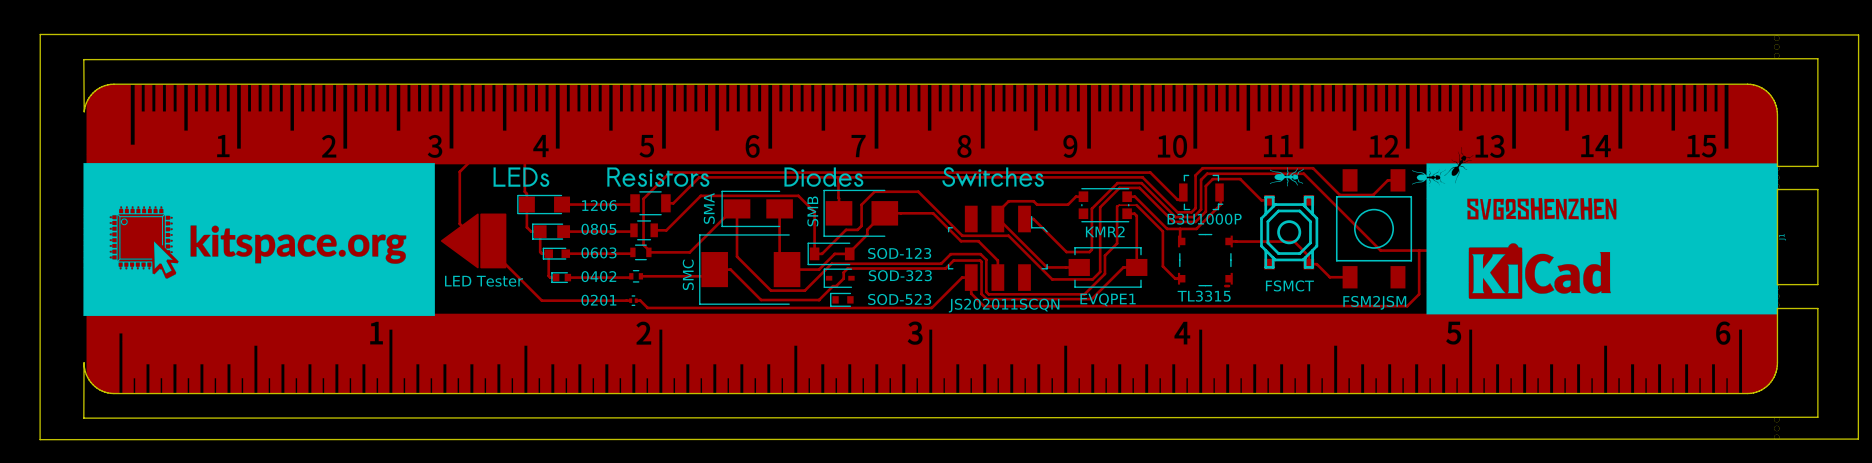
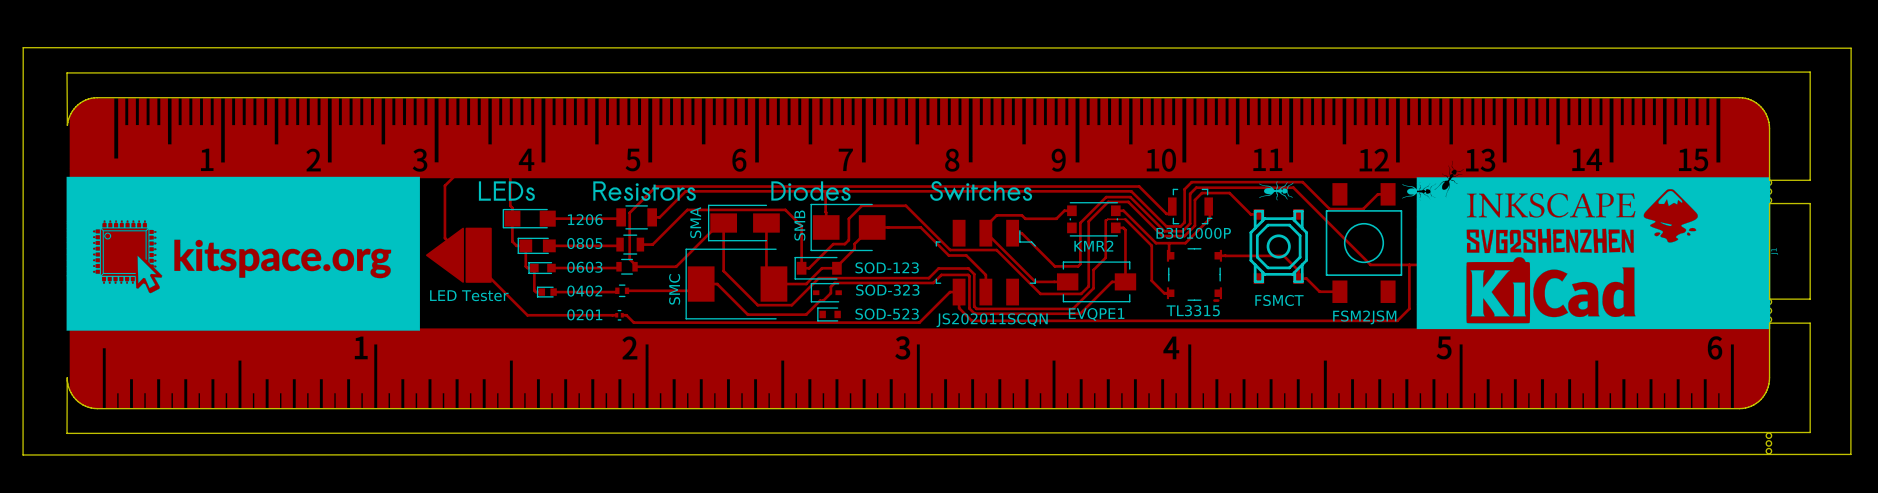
part footprint: [39, 33, 1860, 441] -> [22, 47, 1852, 456]

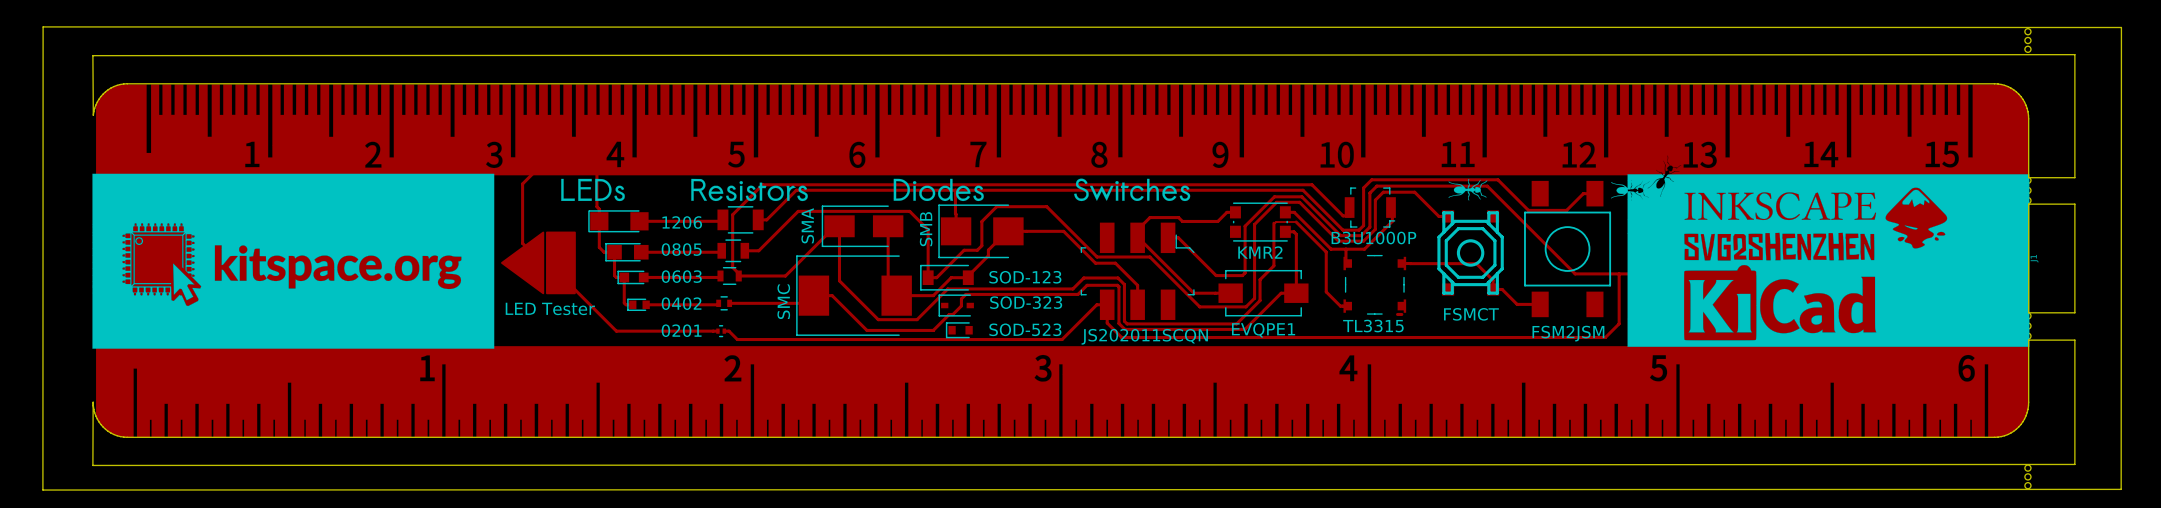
part footprint: [22, 47, 1852, 456] -> [42, 26, 2123, 491]

